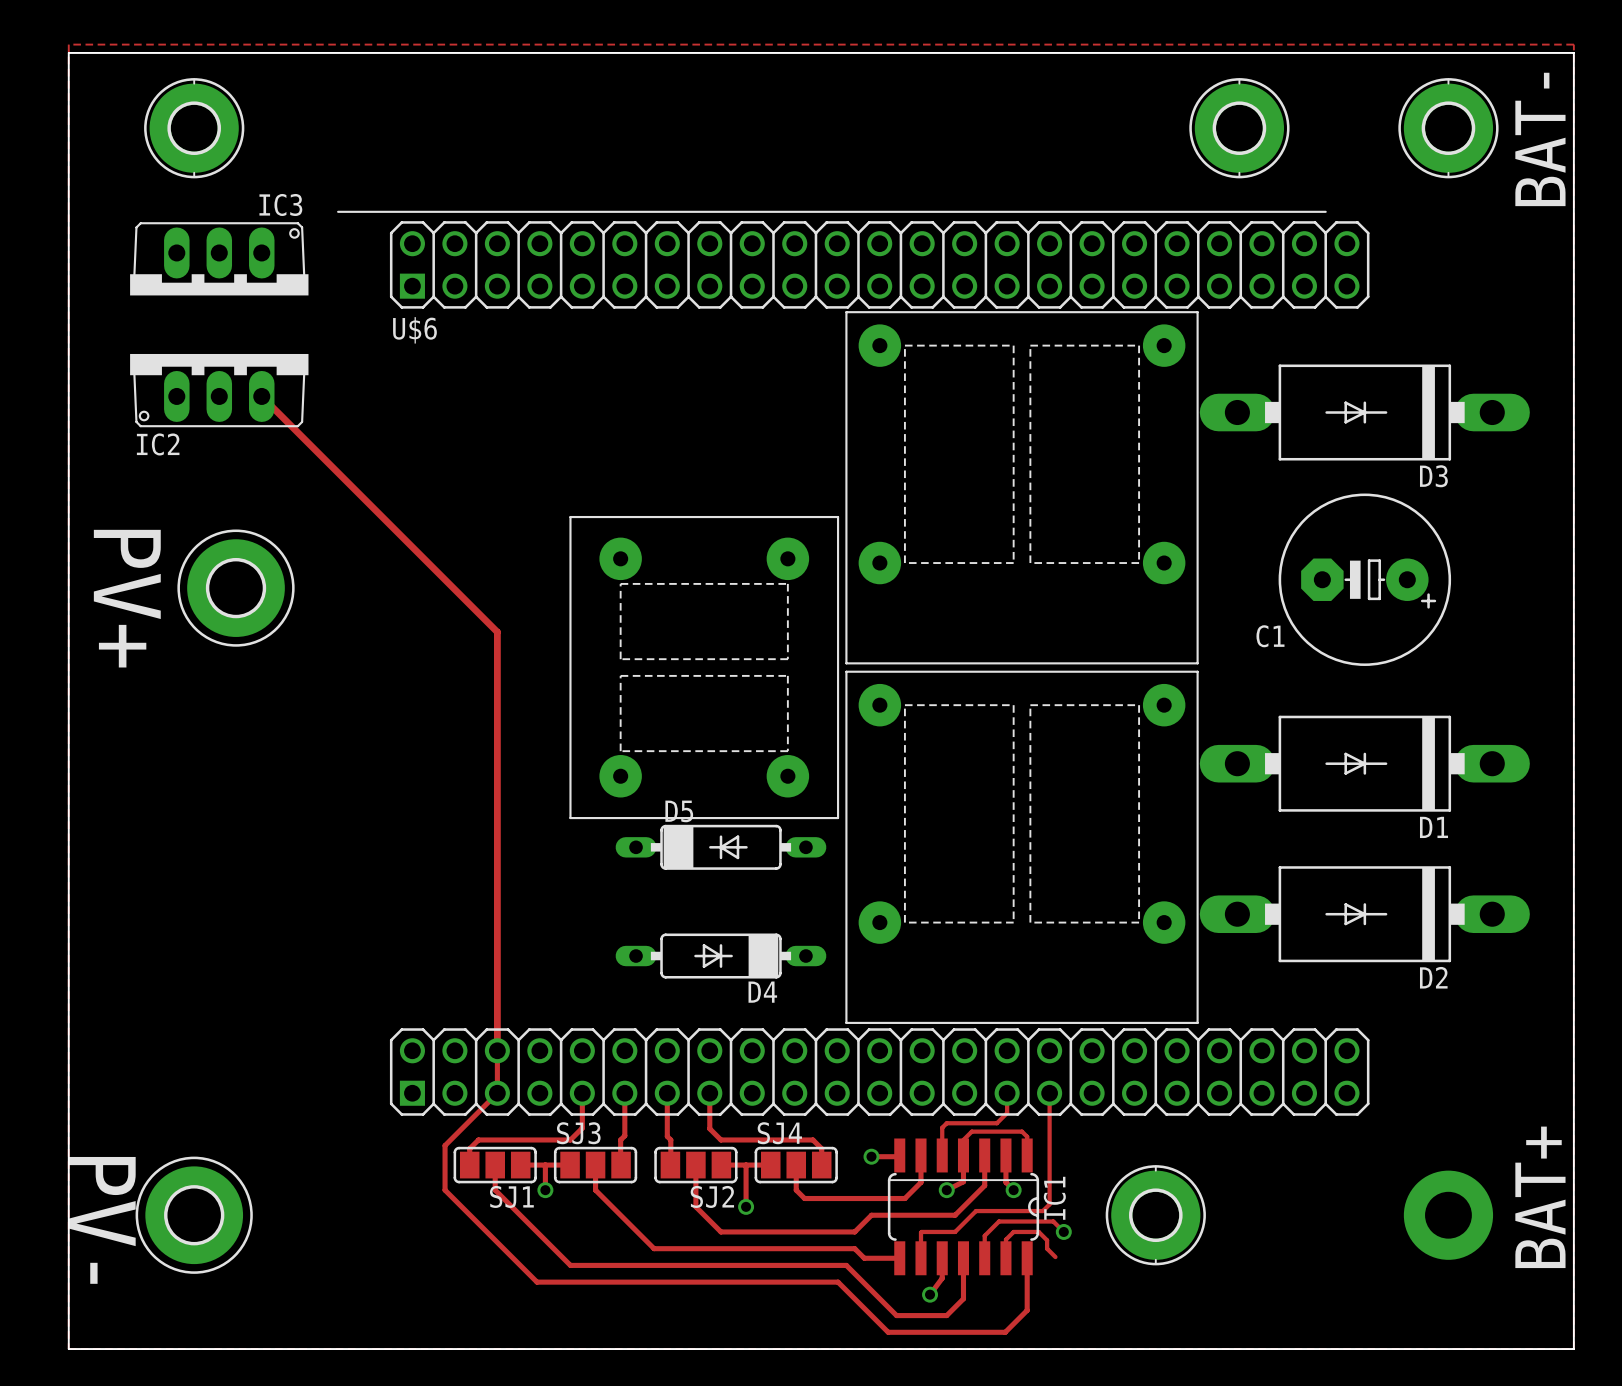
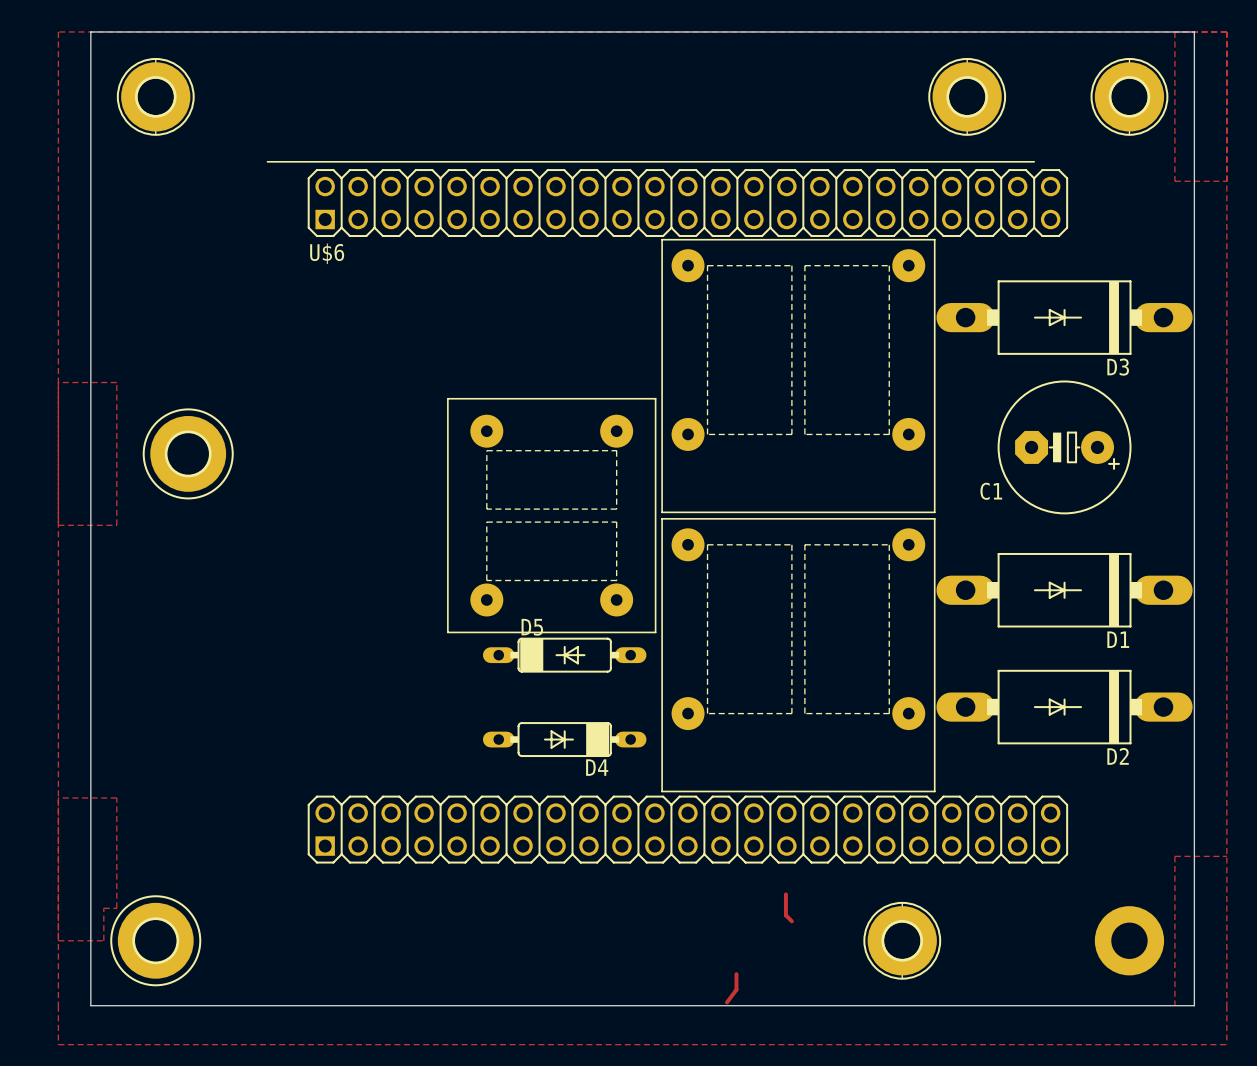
zone outline: none -> (1174, 31) (1174, 181) (1226, 181)
board edge: (68, 52) (1573, 52) (1573, 1349) (68, 1349) (68, 52) -> (90, 31) (90, 1005) (1194, 1005) (1194, 31) (90, 31)
text: BAT- (1540, 139) -> none
IC3: (219, 258) -> none
IC2: (219, 390) -> none
track: (261, 396) (497, 632) (497, 1093) (445, 1145) (445, 1190) (537, 1282) (838, 1282) (888, 1332) (1005, 1332) (1027, 1310) (1027, 1258) -> none
zone outline: none -> (58, 382) (116, 382) (116, 525) (58, 525)
text: PV+ (127, 598) -> none
zone outline: none -> (58, 797) (116, 797) (116, 908) (103, 908) (103, 940) (58, 940)
track: (582, 1093) (582, 1128) (570, 1139) (478, 1139) (469, 1148) (469, 1165) -> none
track: (624, 1093) (624, 1135) (620, 1139) (621, 1165) -> none
track: (667, 1093) (667, 1136) (670, 1139) (670, 1165) -> none
track: (709, 1093) (709, 1128) (720, 1139) (812, 1139) (821, 1148) (821, 1165) -> none
track: (1007, 1093) (1007, 1113) (996, 1123) (946, 1123) (942, 1127) (942, 1155) -> none
track: (1049, 1093) (1049, 1204) (1042, 1211) (976, 1211) (955, 1231) (921, 1231) (921, 1258) -> none
zone outline: none -> (1226, 856) (1174, 856) (1174, 1005)
track: (899, 1155) (871, 1156) -> none
track: (921, 1155) (921, 1182) (904, 1198) (804, 1198) (796, 1190) (796, 1165) -> none
track: (984, 1155) (984, 1185) (955, 1215) (871, 1215) (854, 1231) (720, 1231) (695, 1206) (695, 1165) -> none
track: (1027, 1155) (1027, 1136) (1022, 1131) (971, 1131) (963, 1139) (963, 1181) (946, 1190) -> none
via: (871, 1156) -> none
track: (495, 1165) (495, 1190) (570, 1265) (846, 1265) (896, 1315) (946, 1315) (963, 1298) (963, 1258) -> none
SJ1: (495, 1165) -> none
track: (520, 1165) (570, 1165) -> none
track: (545, 1165) (545, 1190) -> none
track: (595, 1165) (595, 1190) (654, 1248) (854, 1248) (864, 1258) (899, 1258) -> none
SJ3: (595, 1165) -> none
SJ2: (695, 1165) -> none
track: (721, 1165) (770, 1165) -> none
track: (746, 1165) (746, 1206) -> none
SJ4: (796, 1165) -> none
via: (545, 1190) -> none
via: (946, 1190) -> none
via: (1013, 1190) -> none
text: BAT+ (1540, 1197) -> none
via: (746, 1206) -> none
IC1: (963, 1206) -> none
text: PV- (102, 1220) -> none
track: (1063, 1231) (1053, 1221) (999, 1221) (984, 1235) (984, 1258) -> none
via: (1063, 1231) -> none
track: (1055, 1257) (1047, 1248) (1047, 1240) (1038, 1231) (1013, 1231) (1005, 1239) (1005, 1258) -> none
via: (930, 1294) -> none

